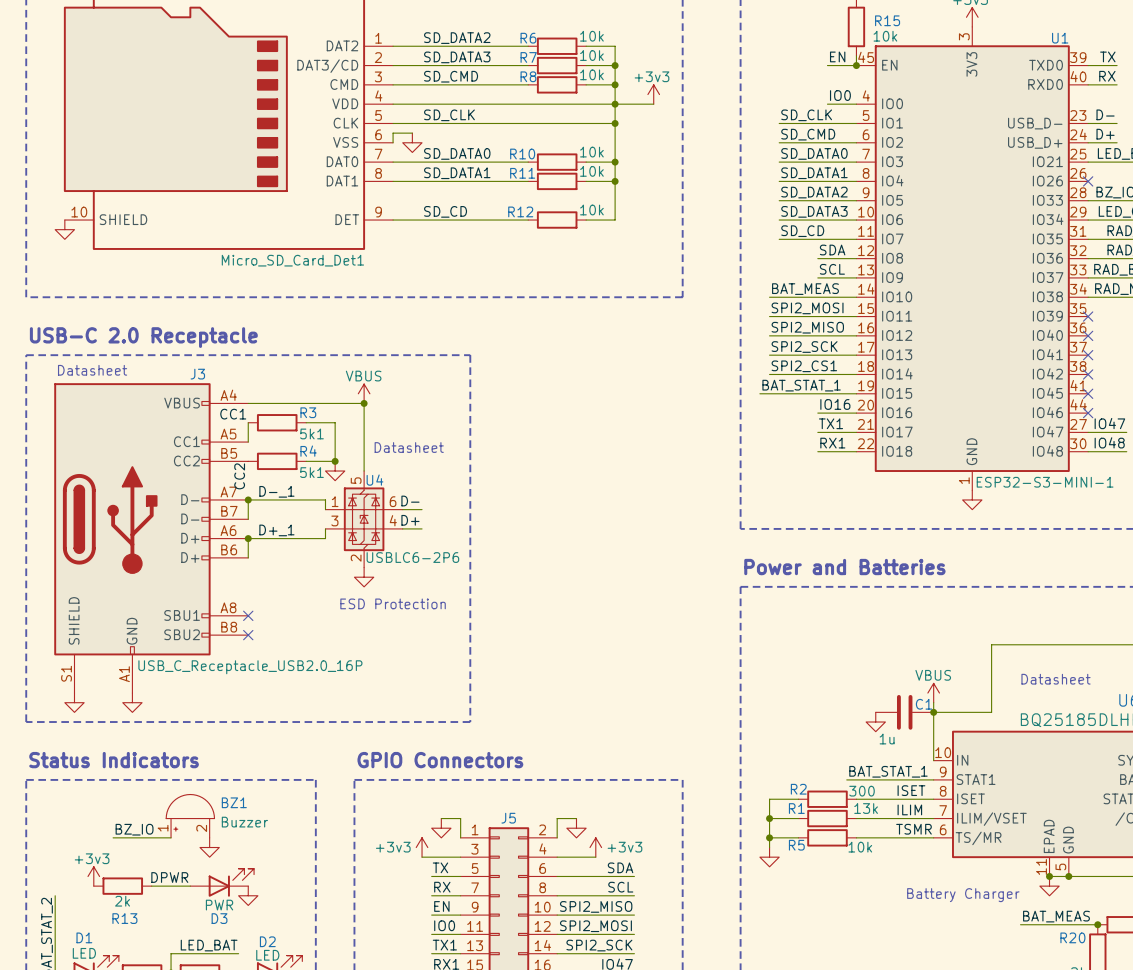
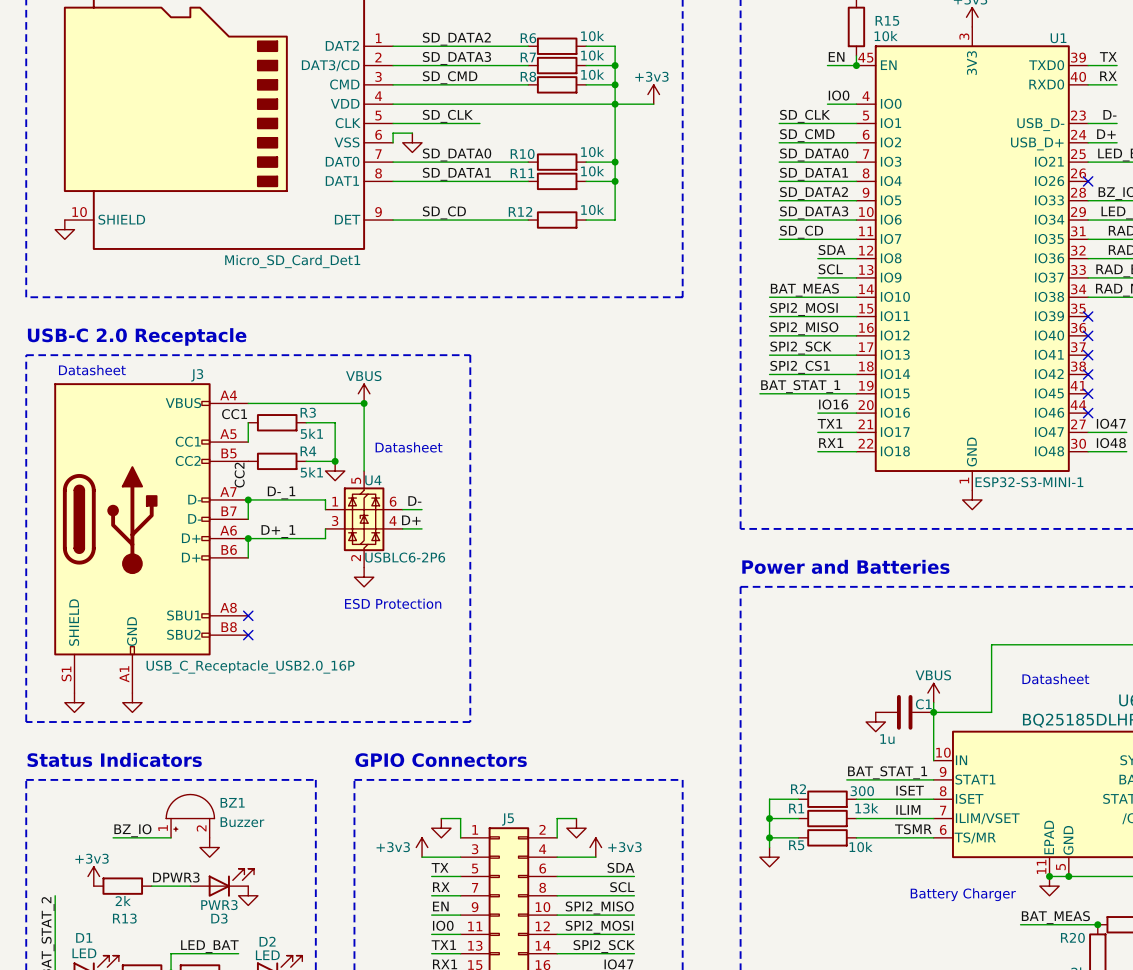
wire: (479, 123) (615, 123) -> none
junction: (615, 123) -> none
label: DPWR (169, 877) -> DPWR3 (176, 877)
D3 value: PWR (219, 905) -> PWR3 (219, 905)

